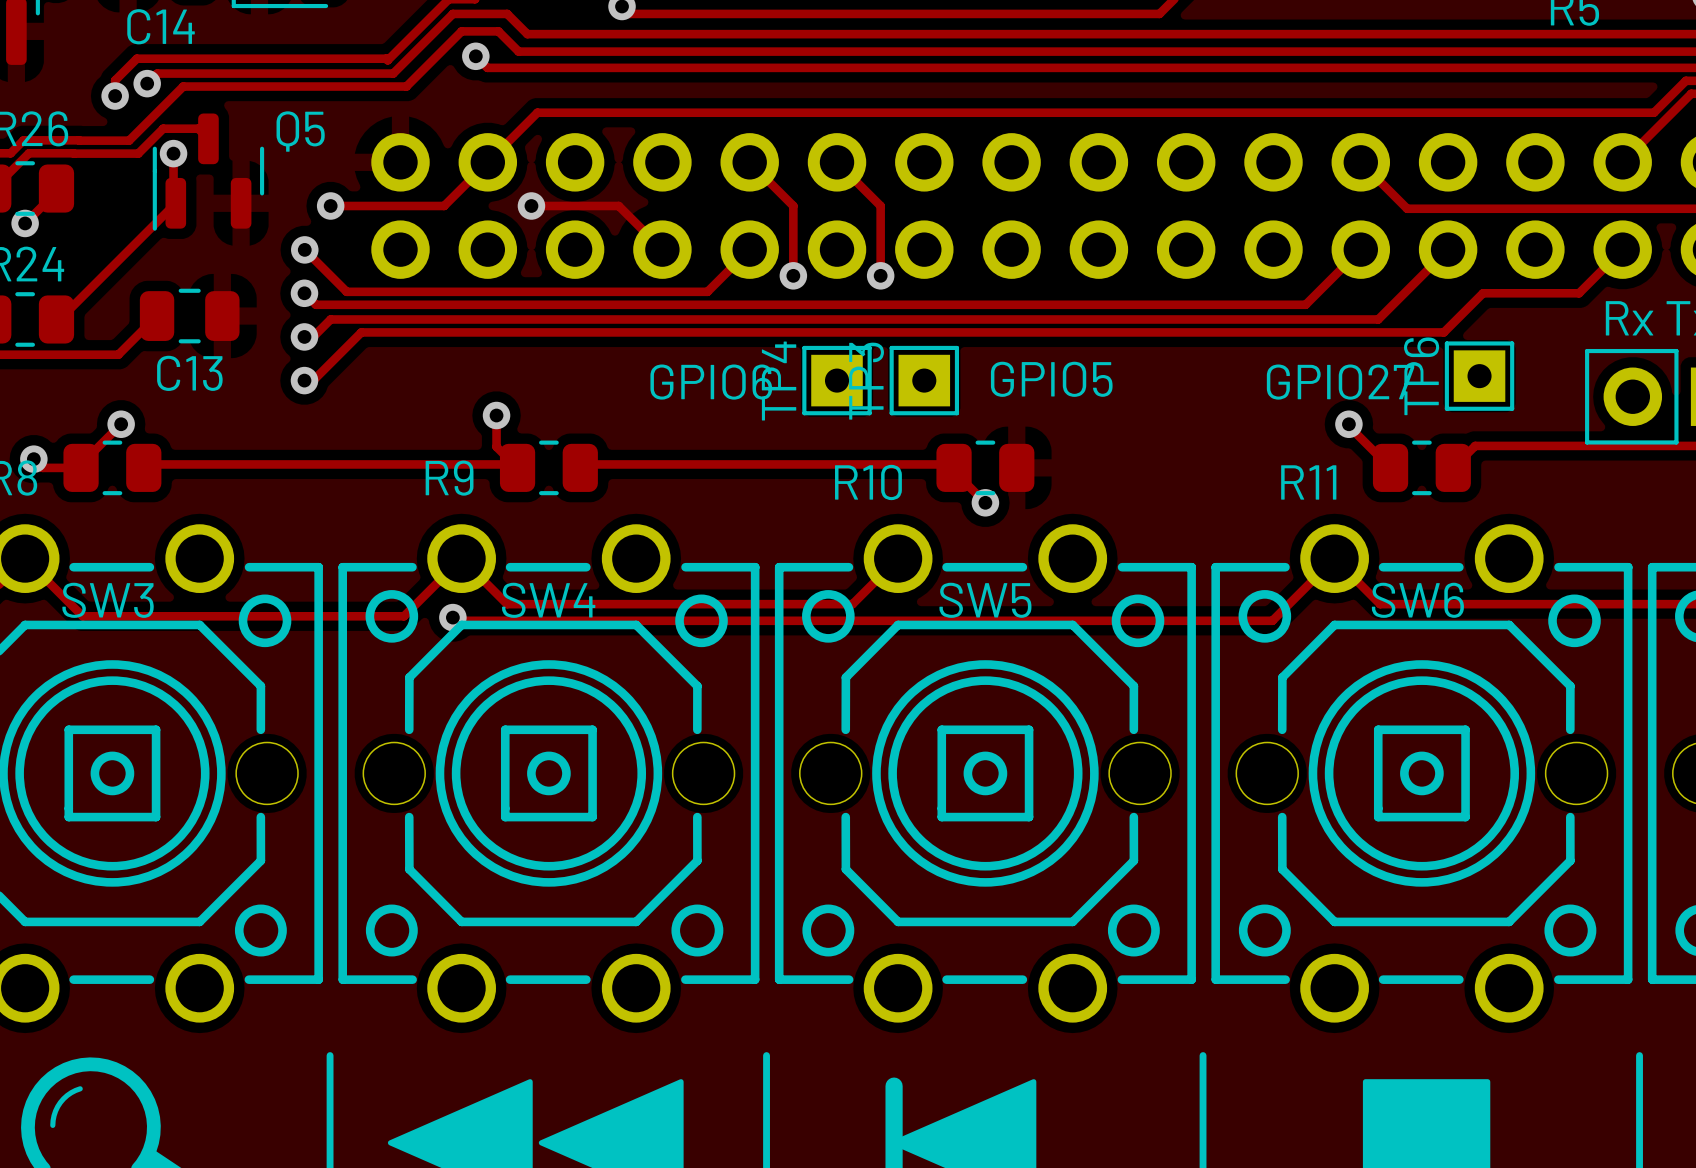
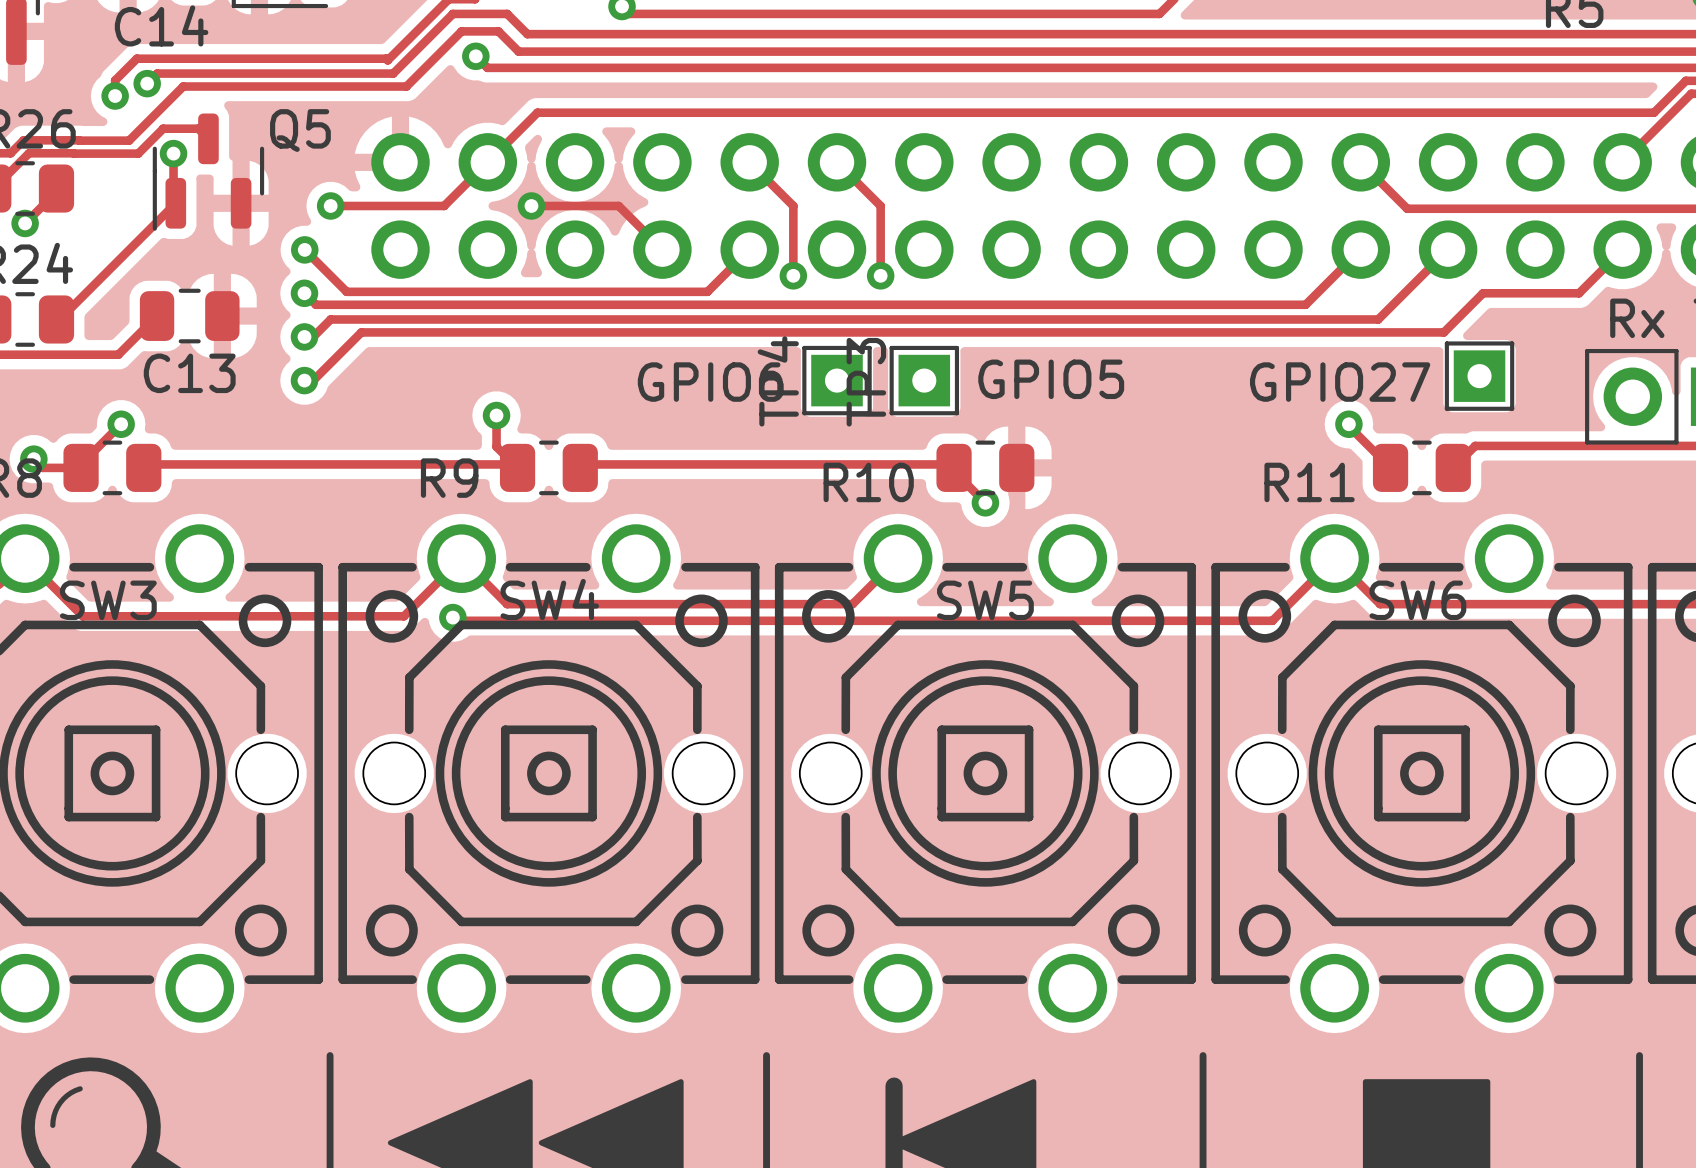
TP6 name: TP6 (1421, 376) -> none

